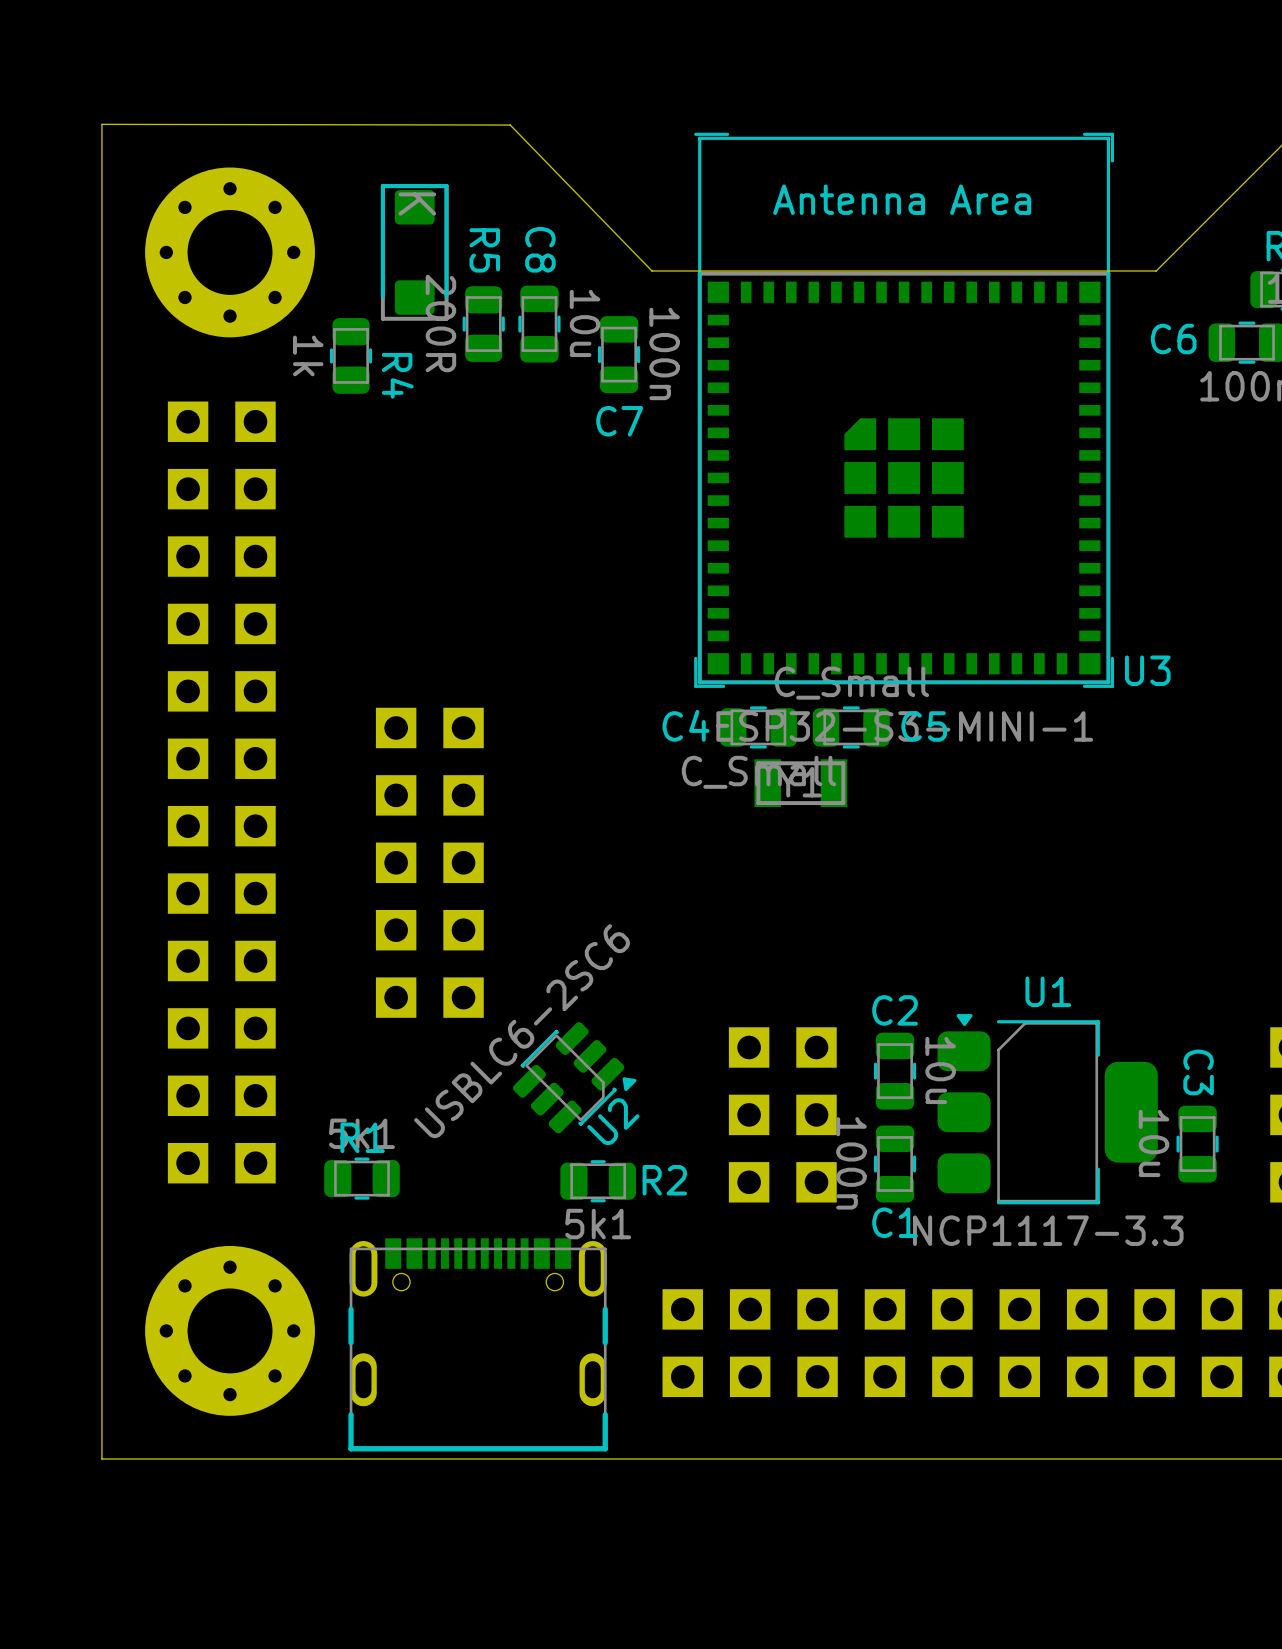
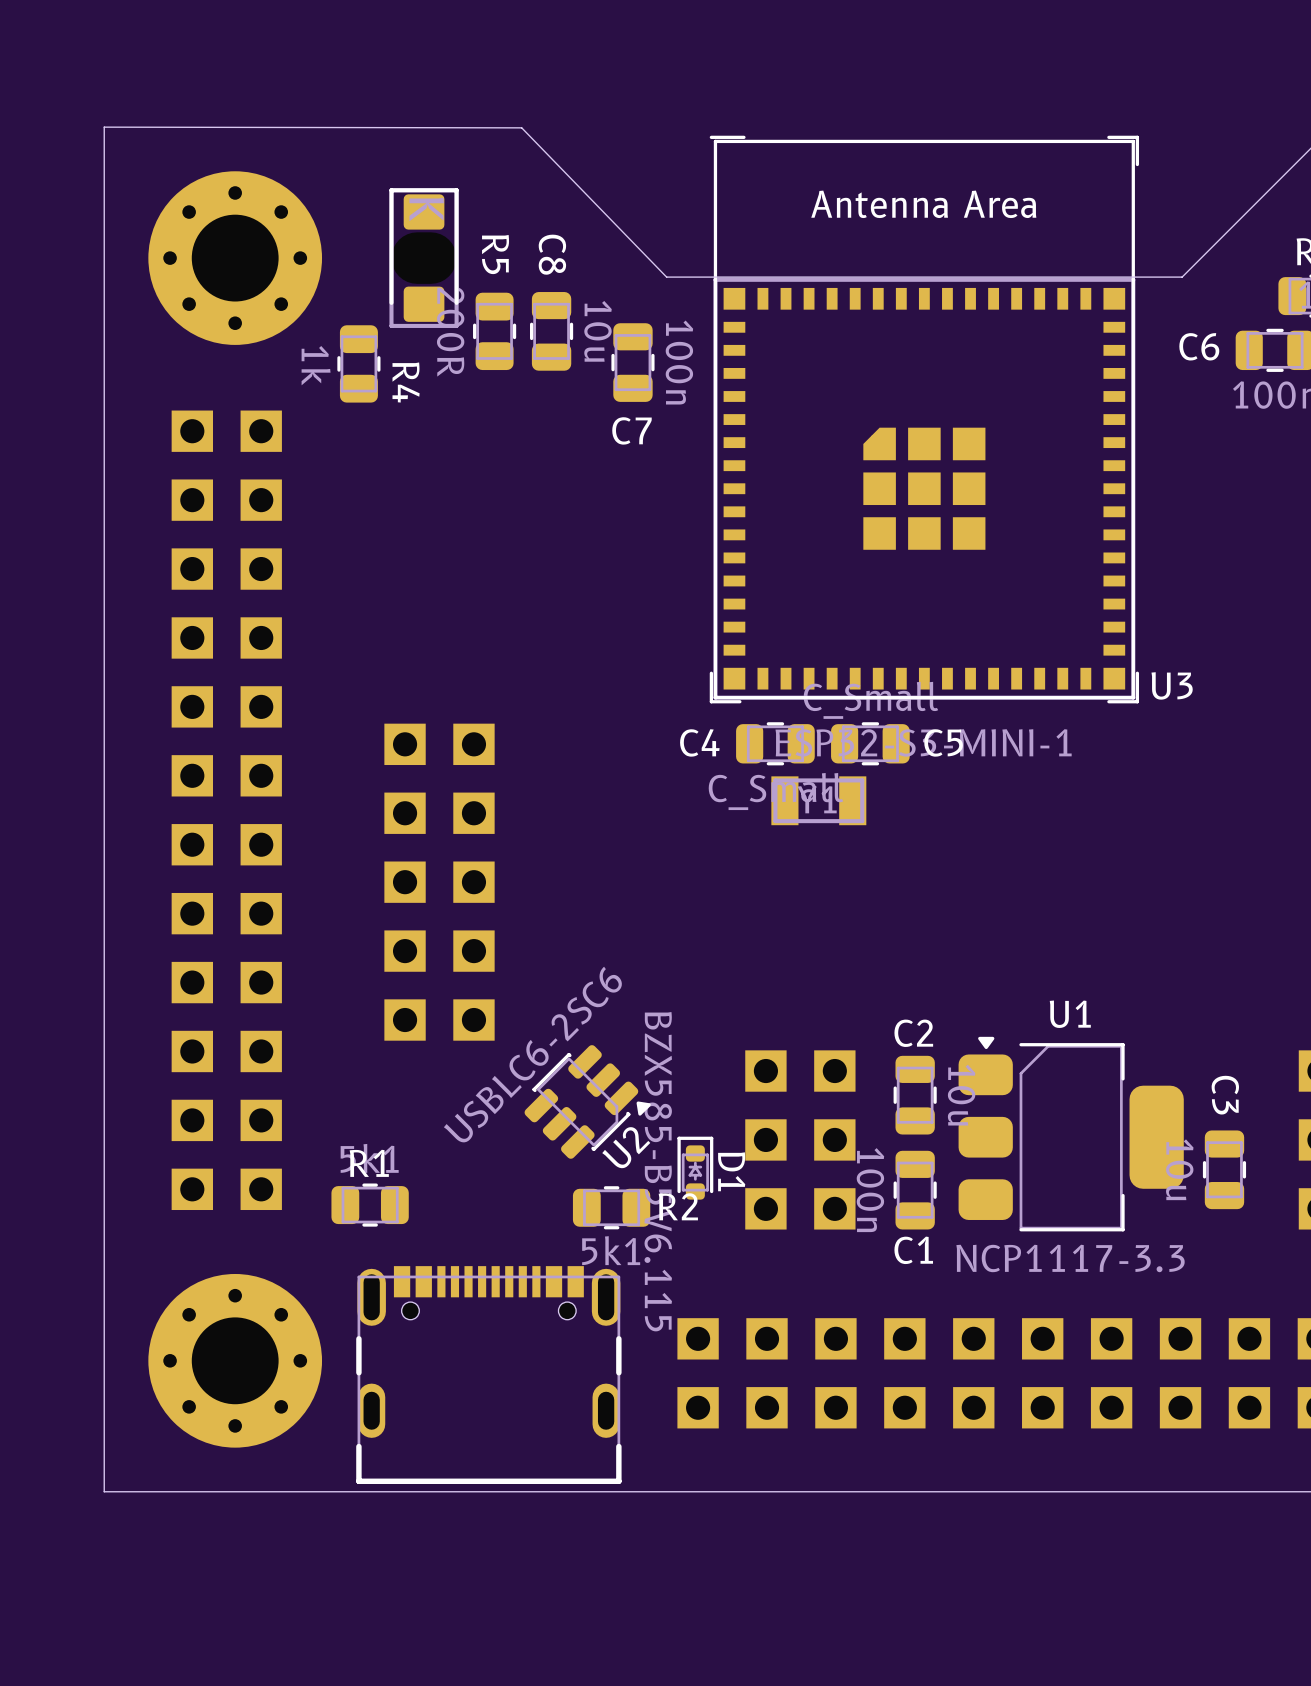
D1: none -> BZX585-B5V6.115 (695, 1168)

